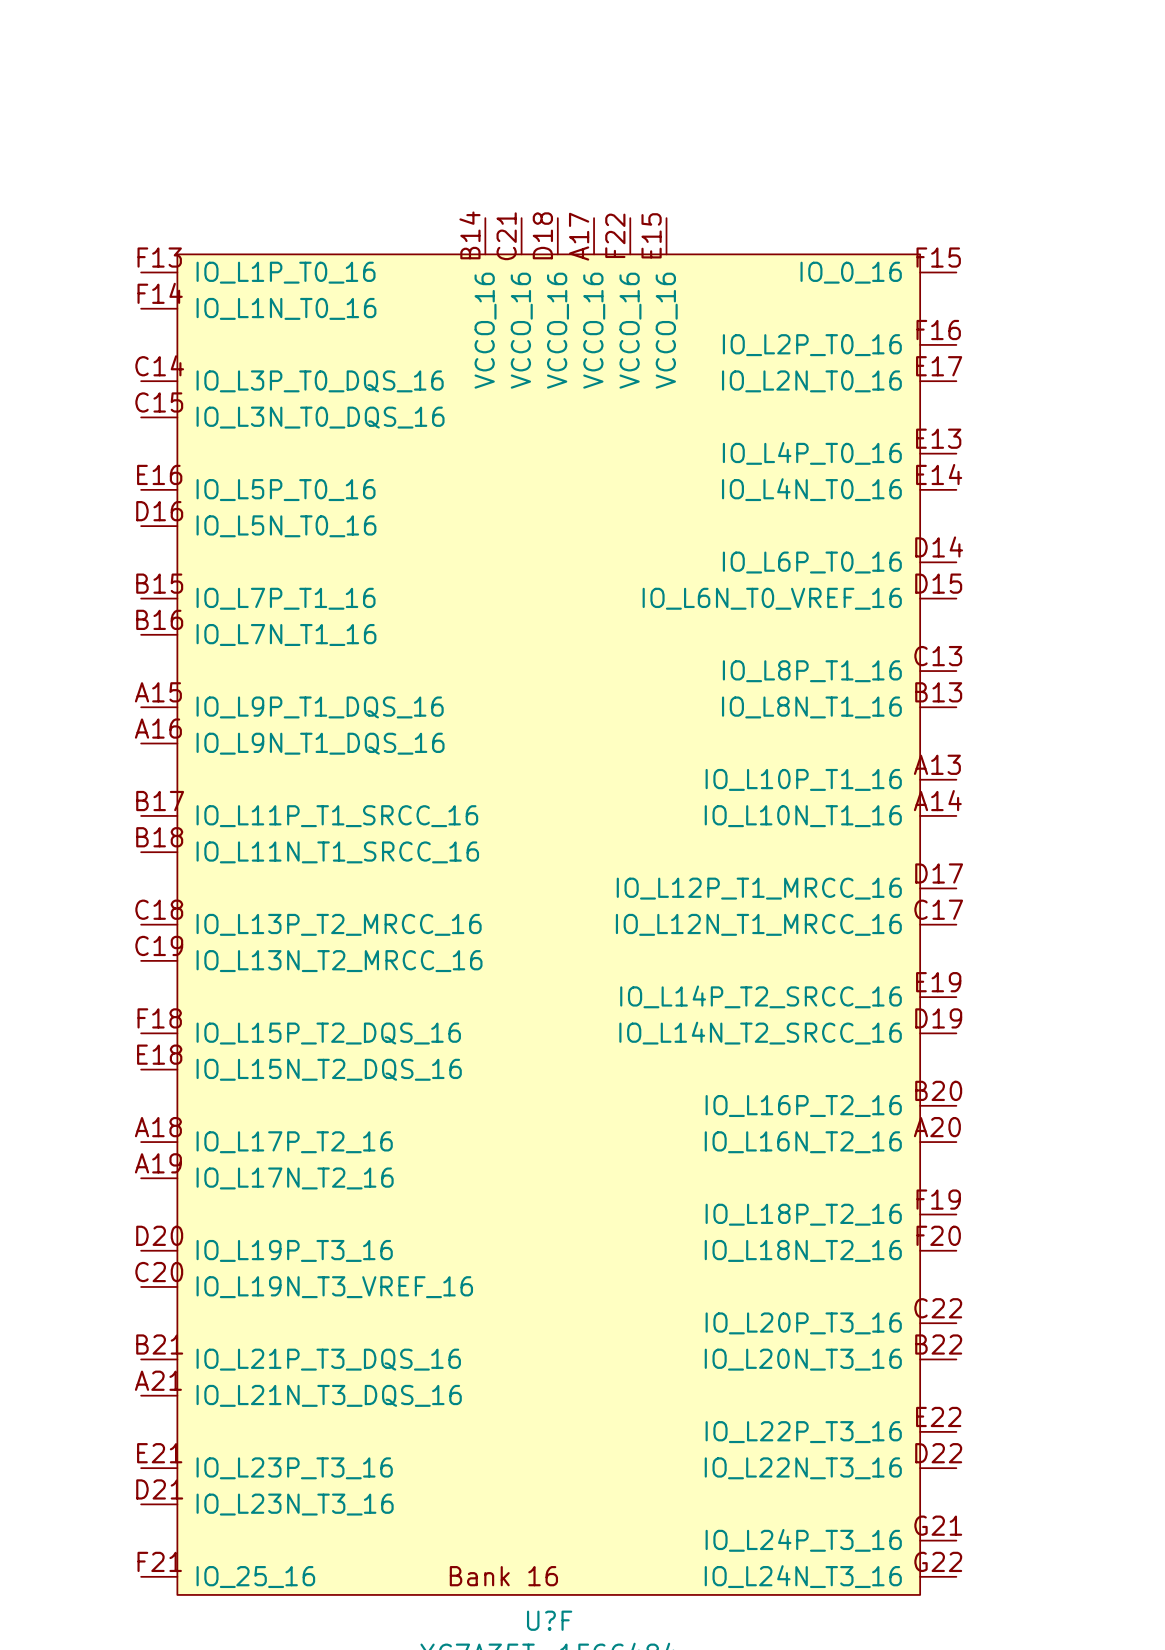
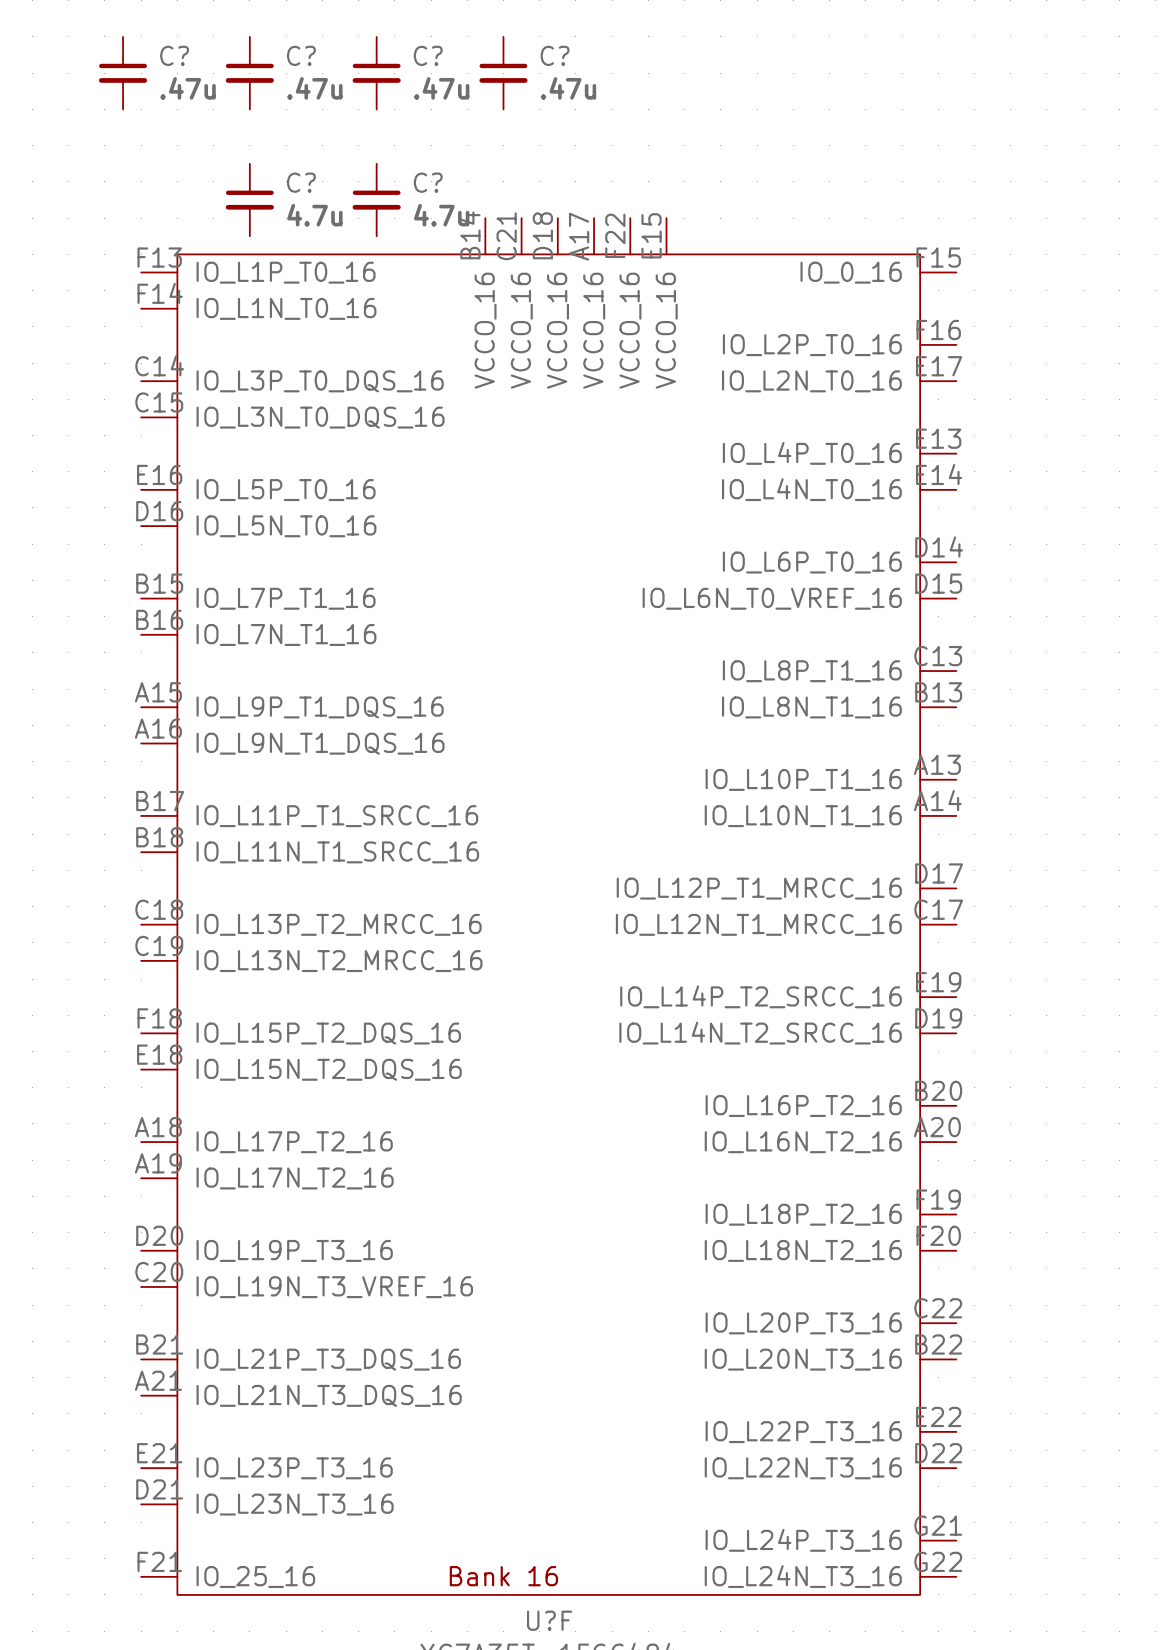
C?: none -> .47u (123, 73)
C?: none -> .47u (249, 73)
C?: none -> .47u (376, 73)
C?: none -> .47u (503, 73)
C?: none -> 4.7u (249, 200)
C?: none -> 4.7u (376, 200)

